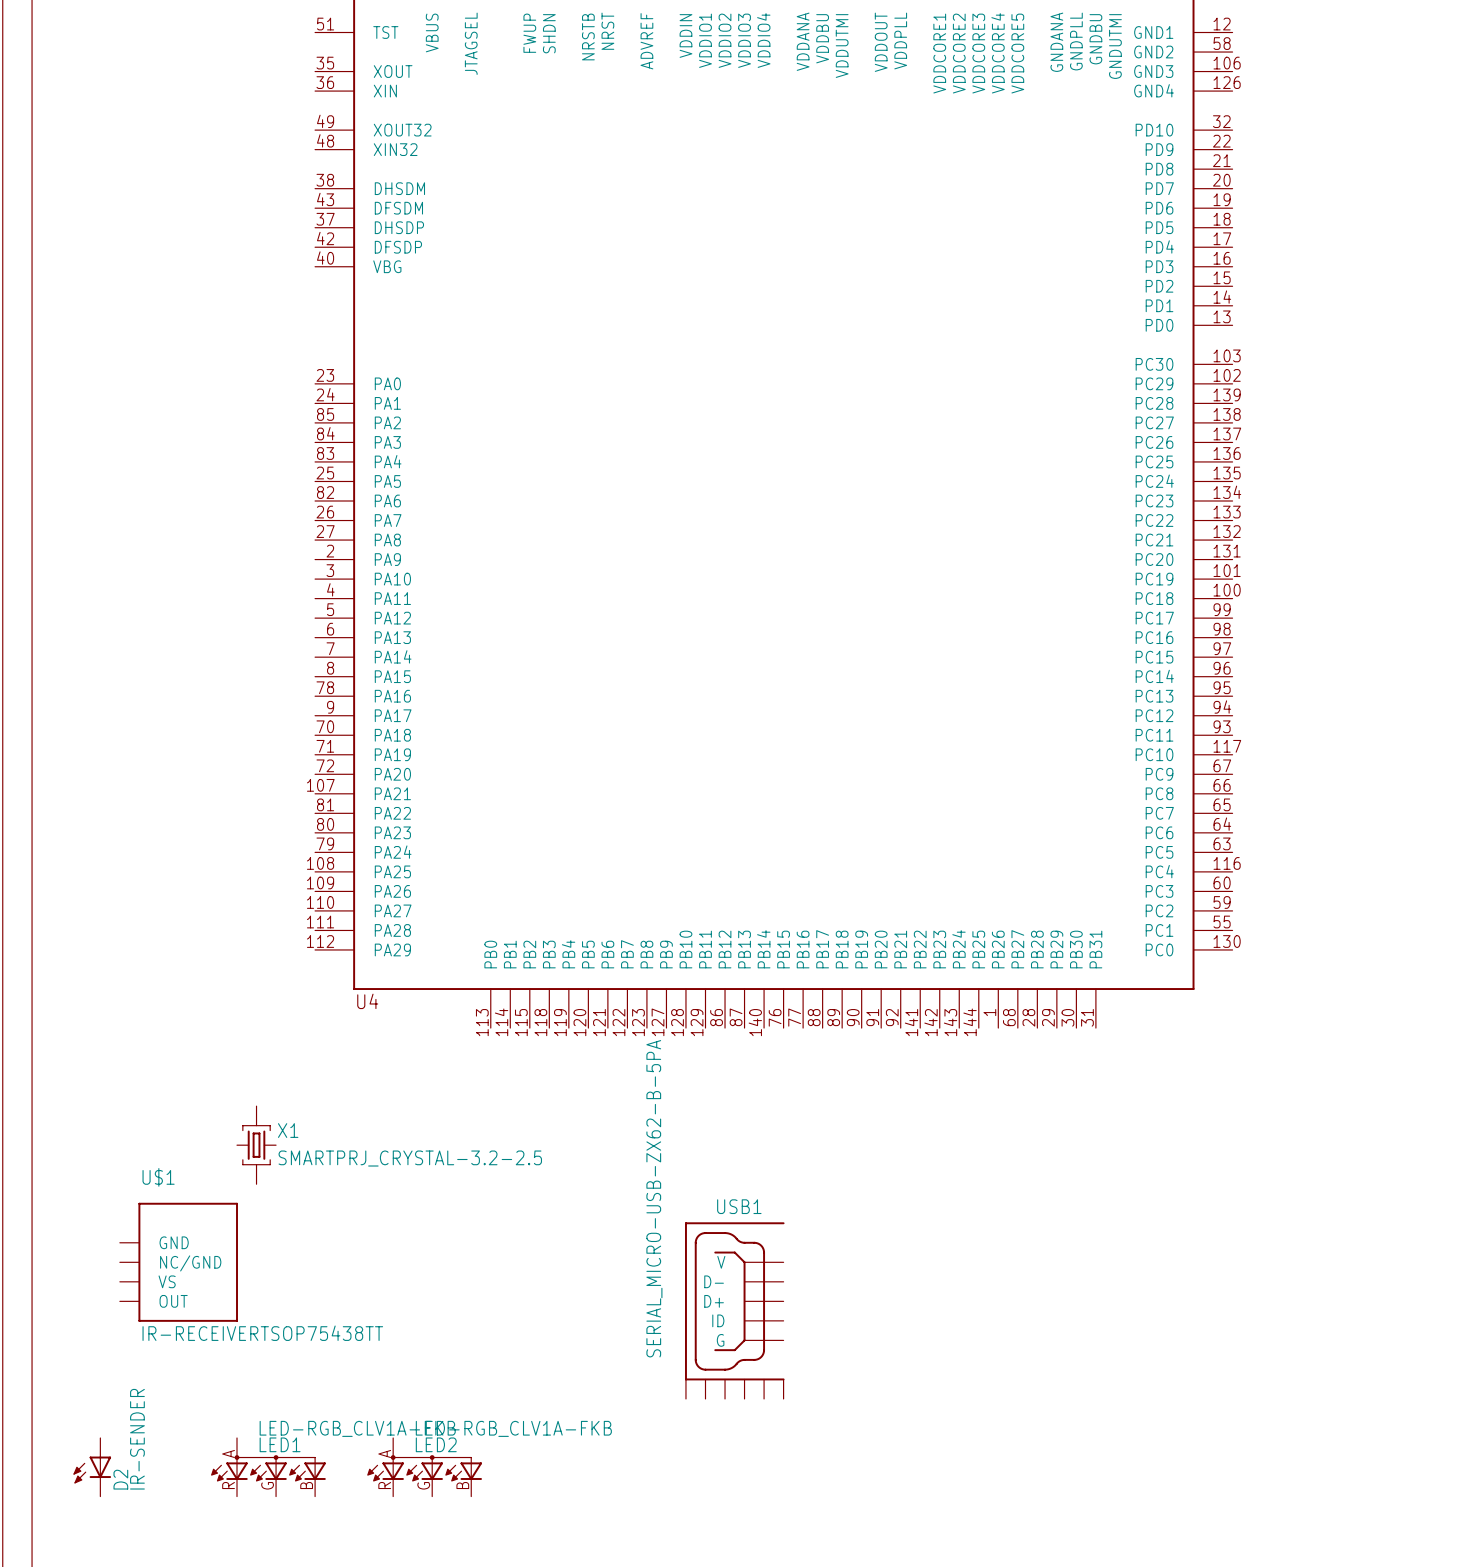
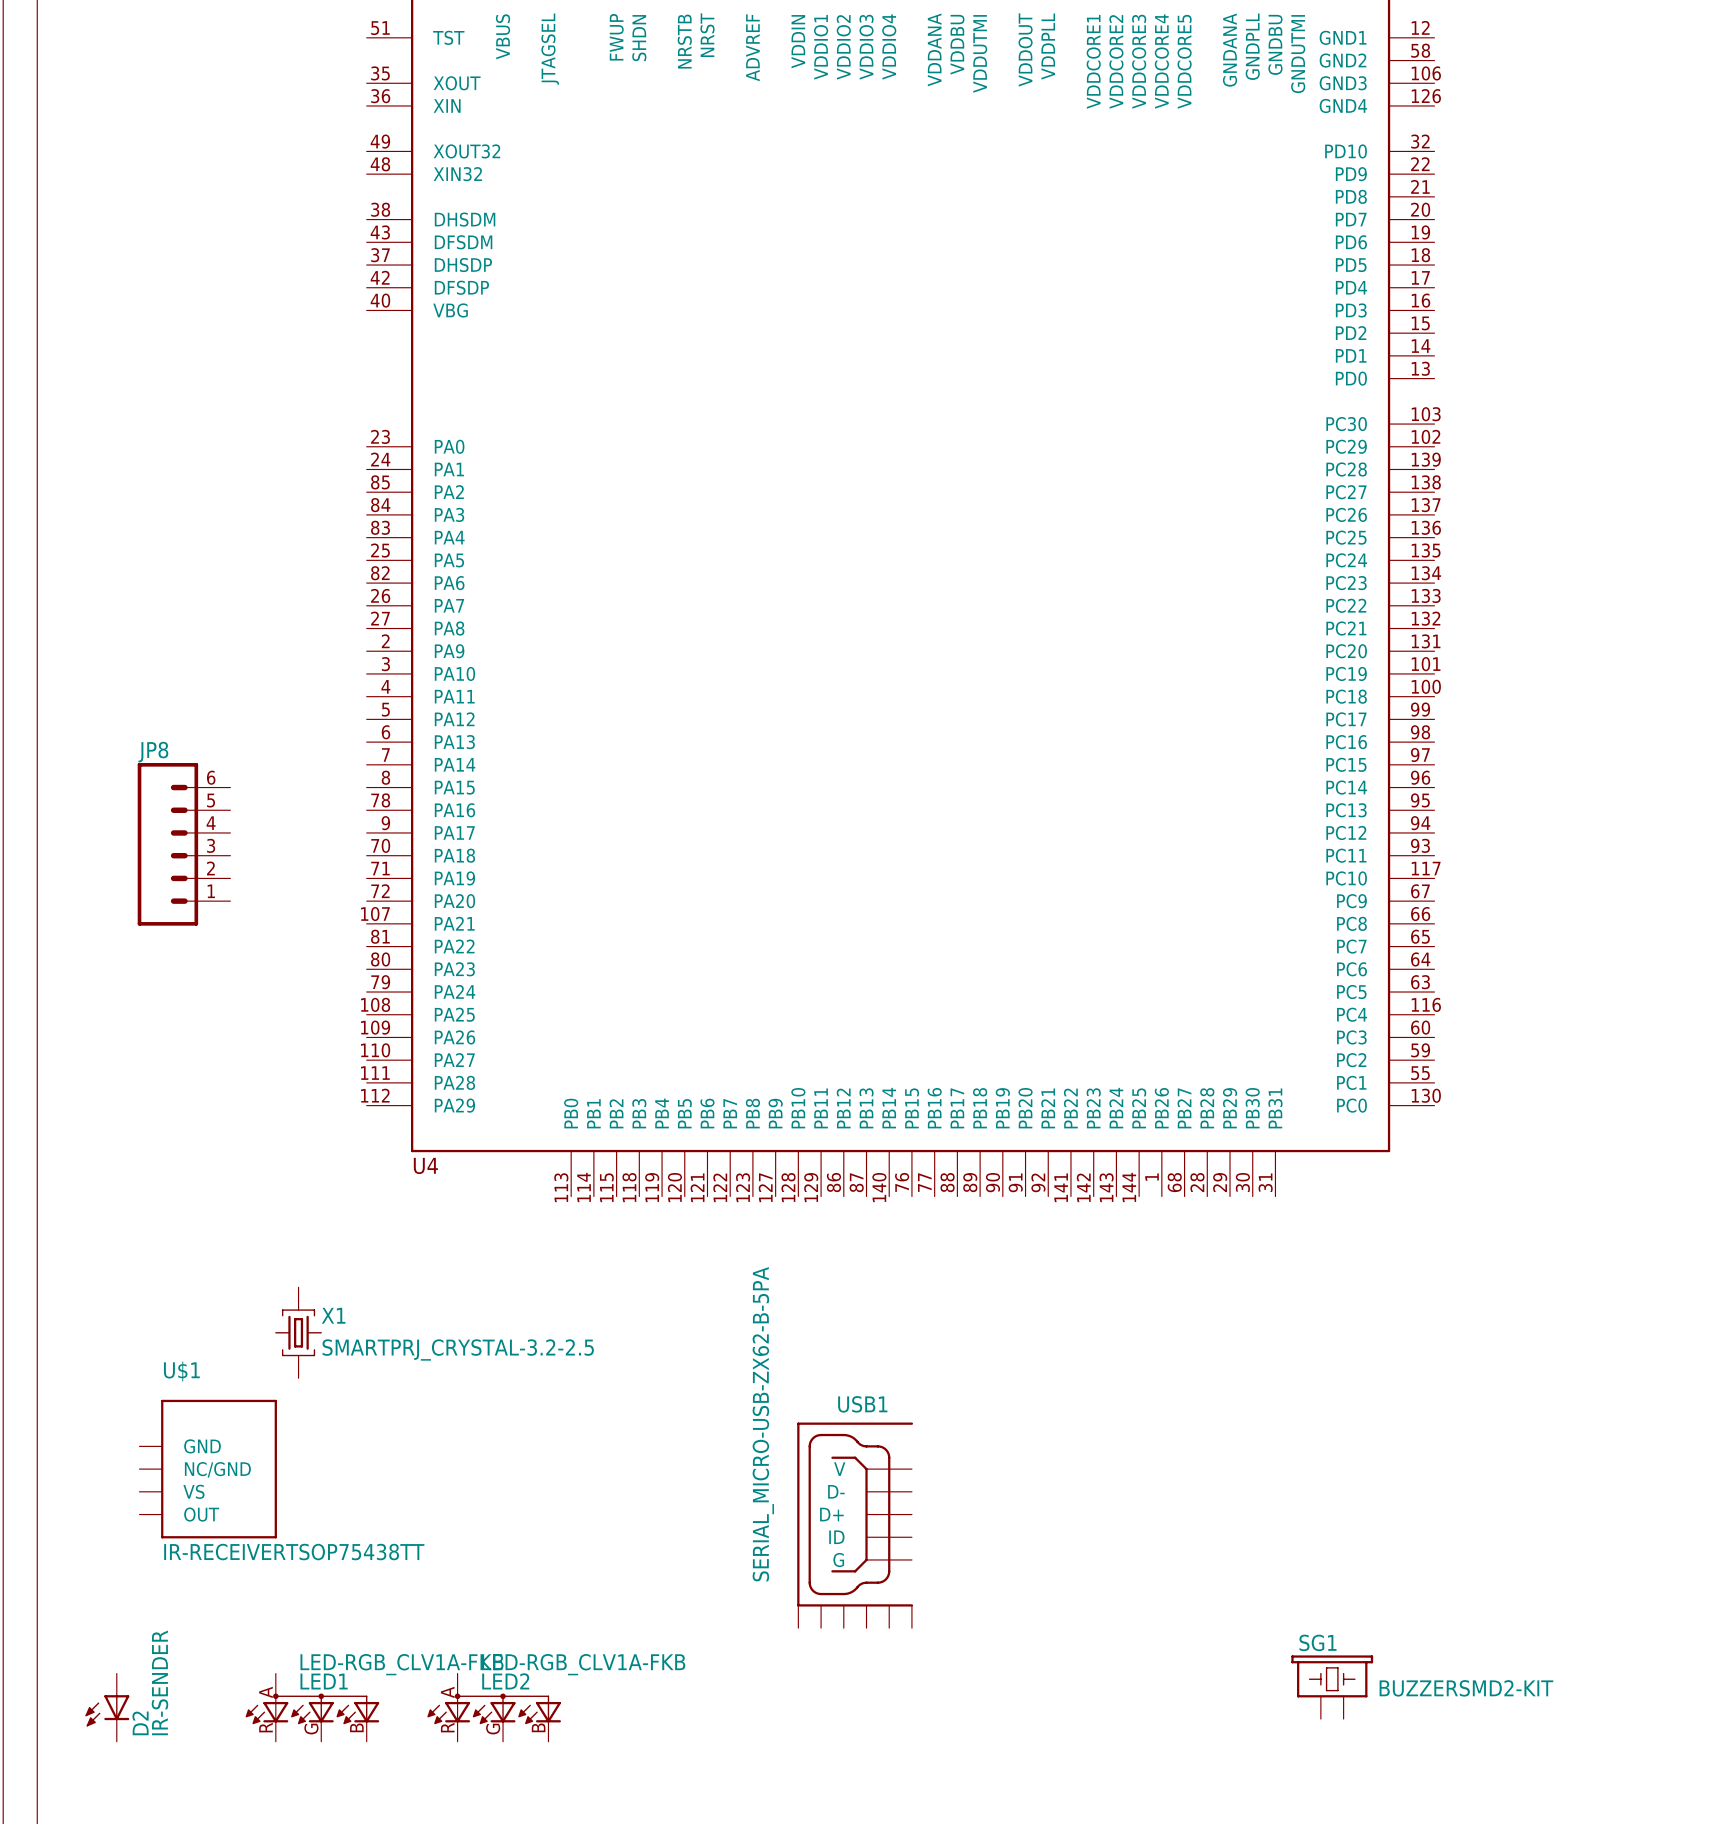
JP8: none -> (184, 844)
SG1: none -> BUZZERSMD2-KIT (1332, 1687)

